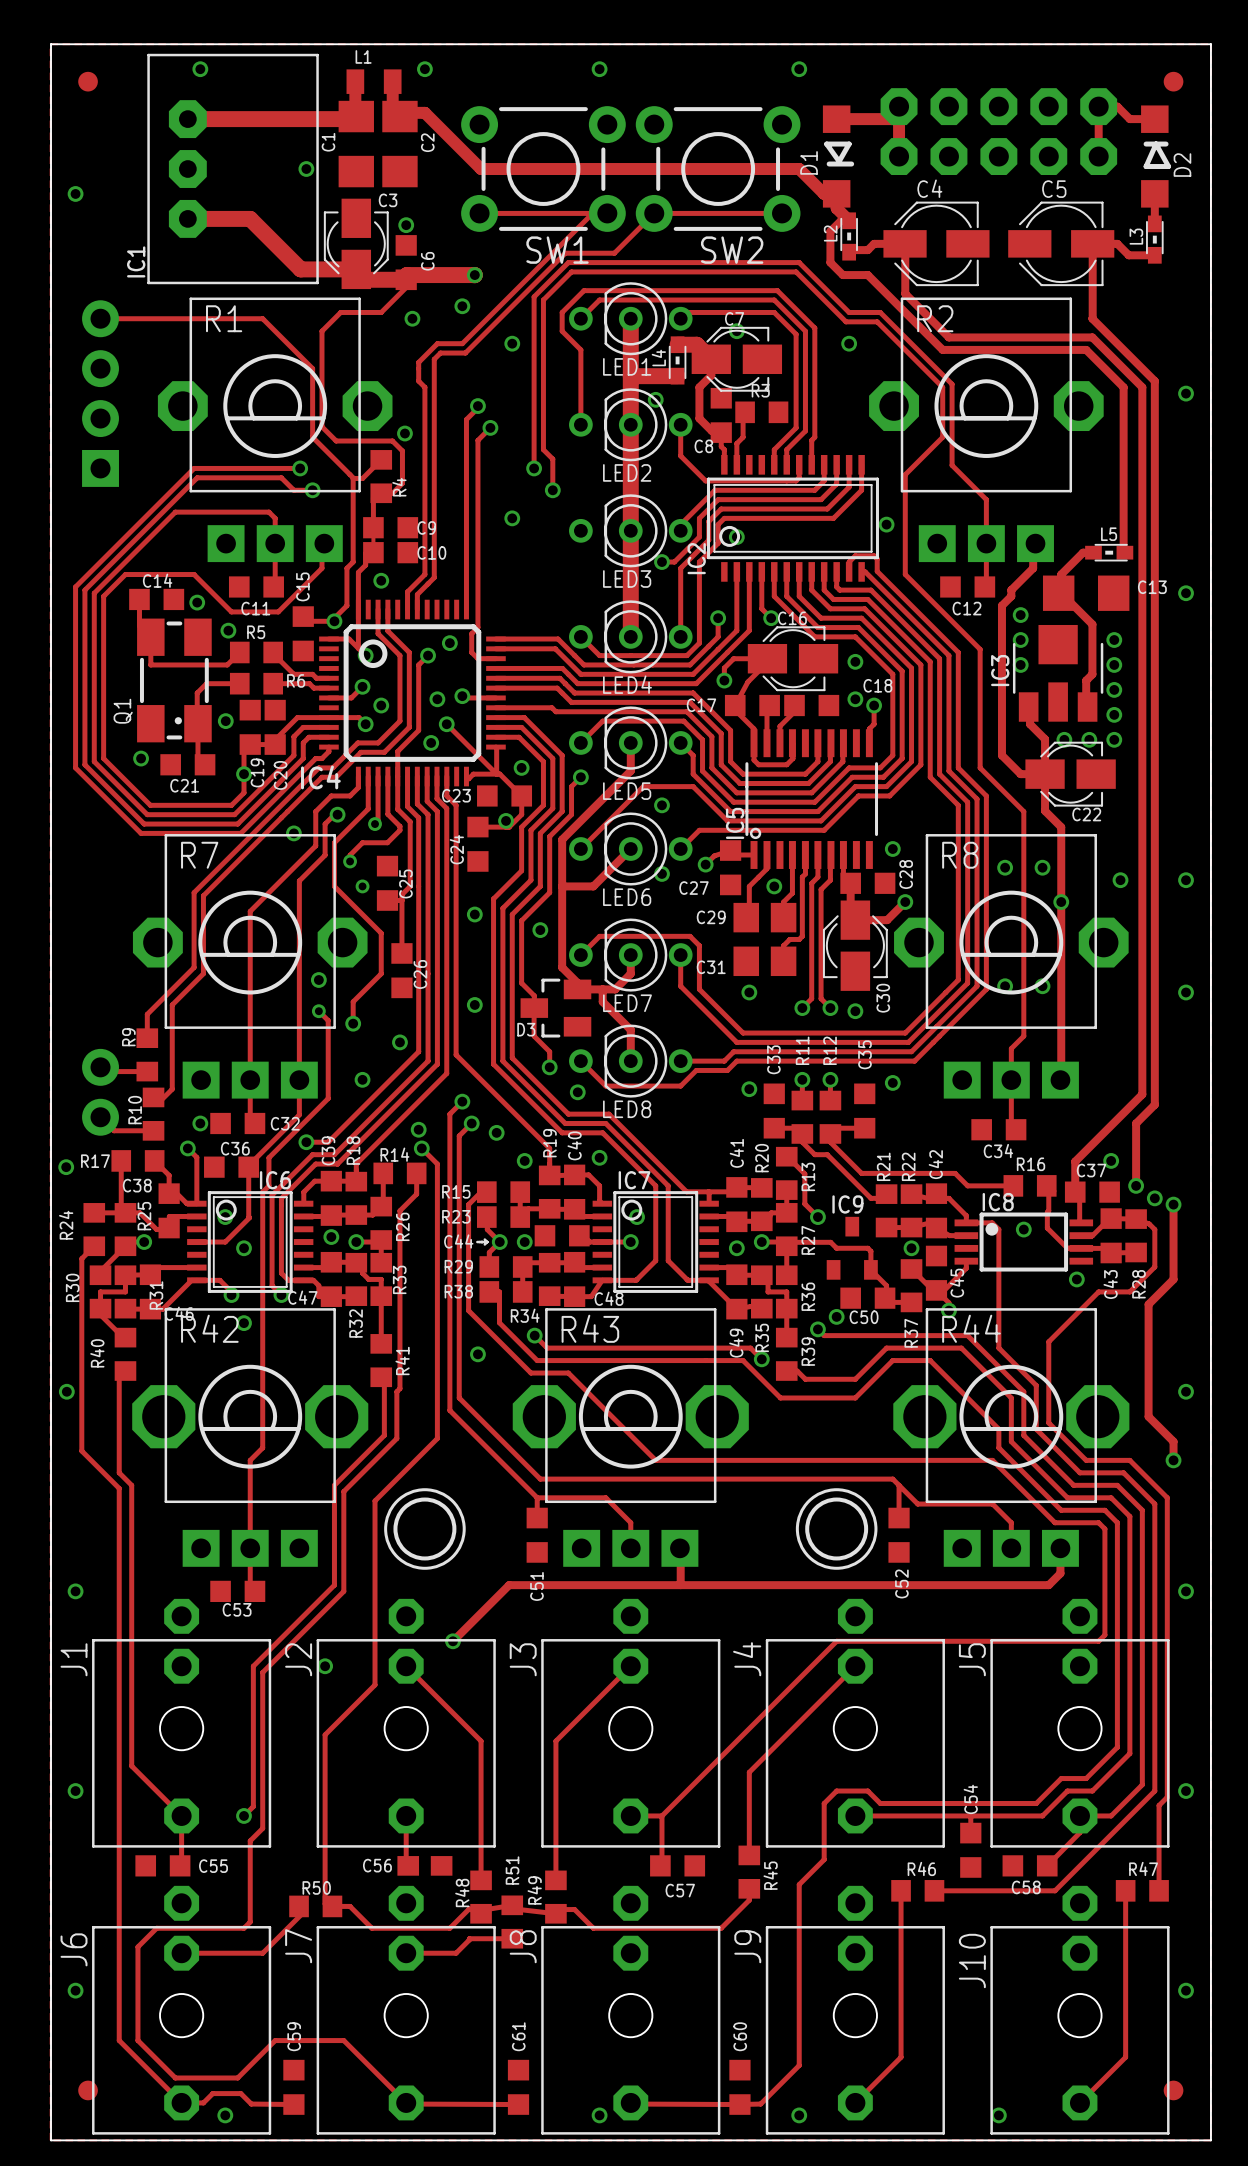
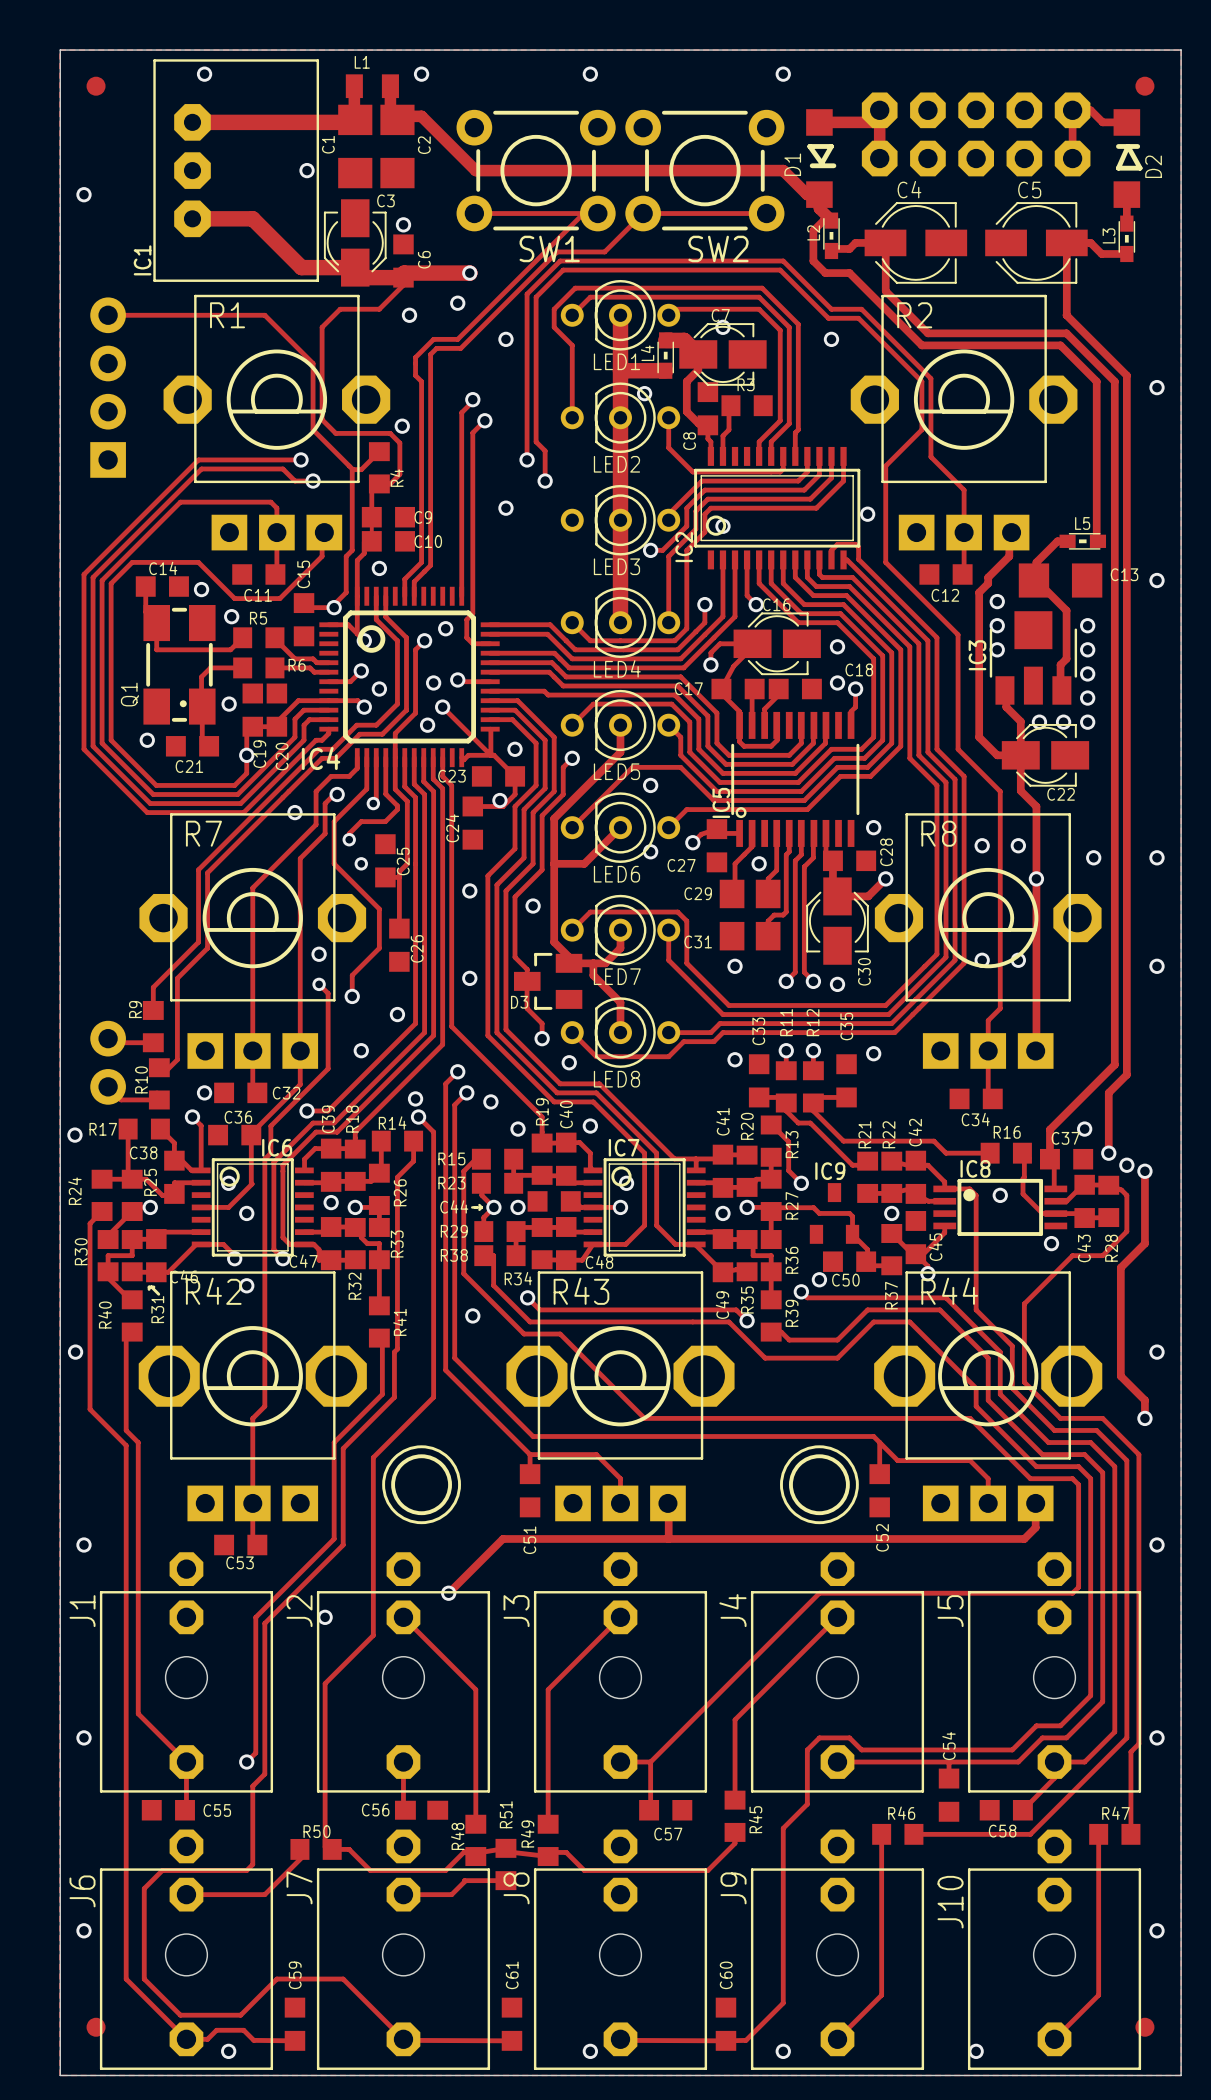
C8 name rotation: 0° (703, 446) -> 90° counterclockwise (689, 441)
R31 name position: R31 (156, 1295) -> R31 (157, 1309)
line: none -> (151, 1287) (158, 1294)
line: none -> (153, 1287) (149, 1287) (149, 1289)

